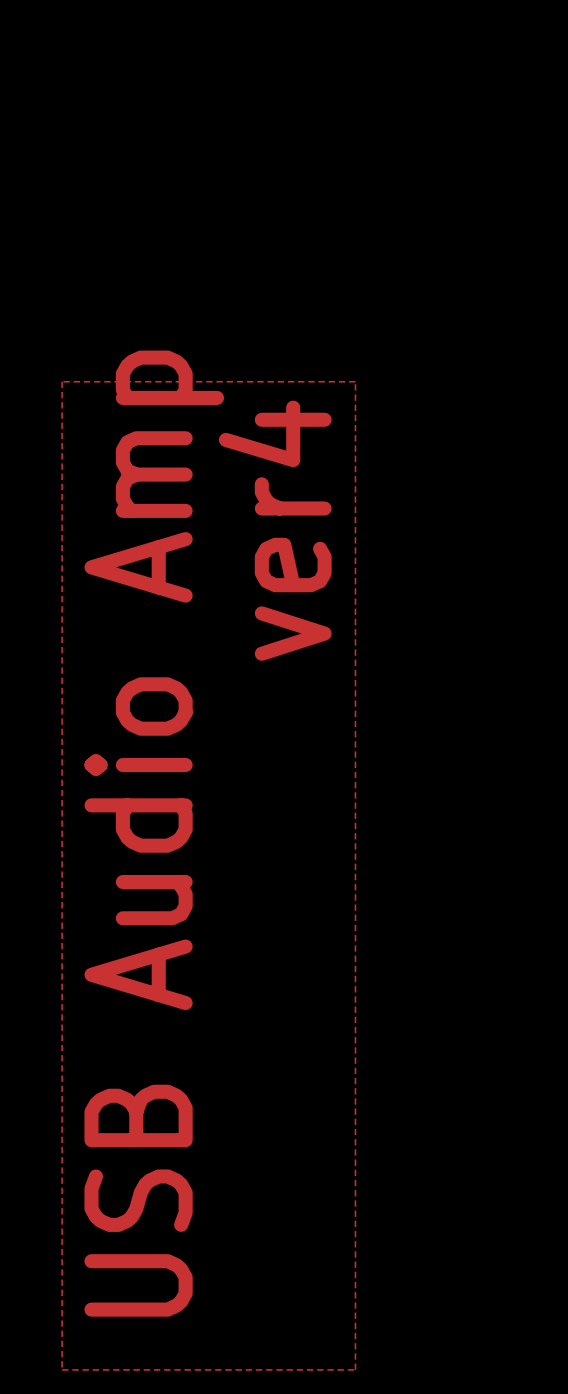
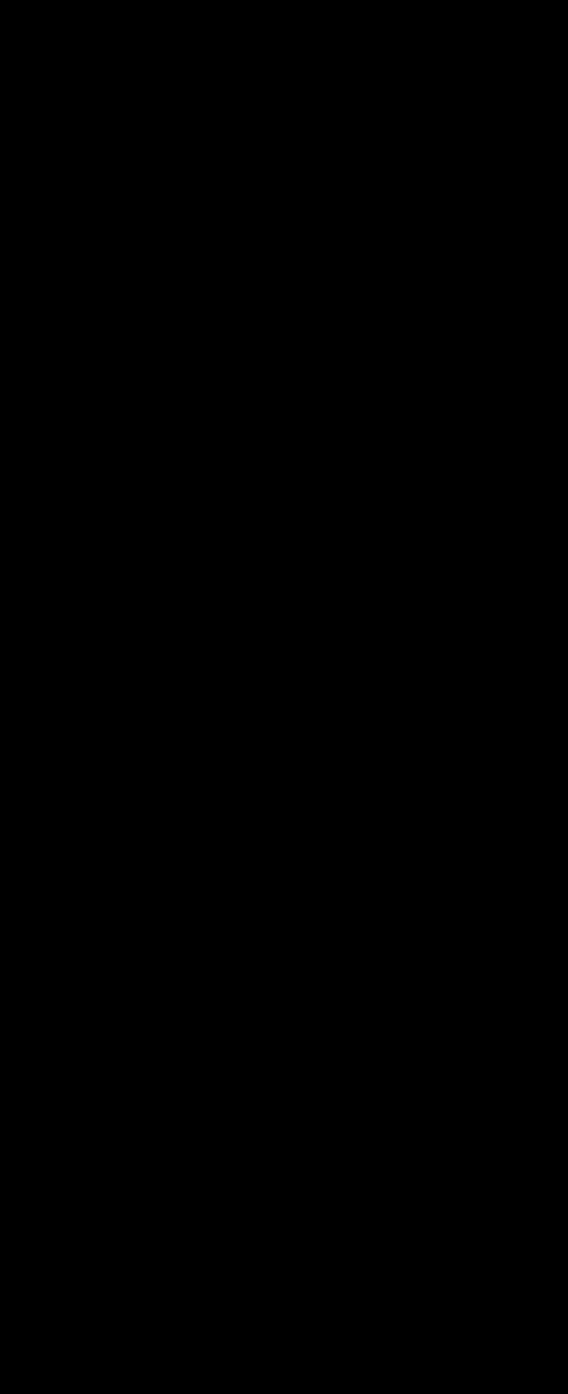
zone outline: (62, 381) (62, 1369) (355, 1369) (355, 381) (62, 381) -> none
text: ver4 (275, 530) -> none
text: USB Audio Amp (154, 833) -> none

